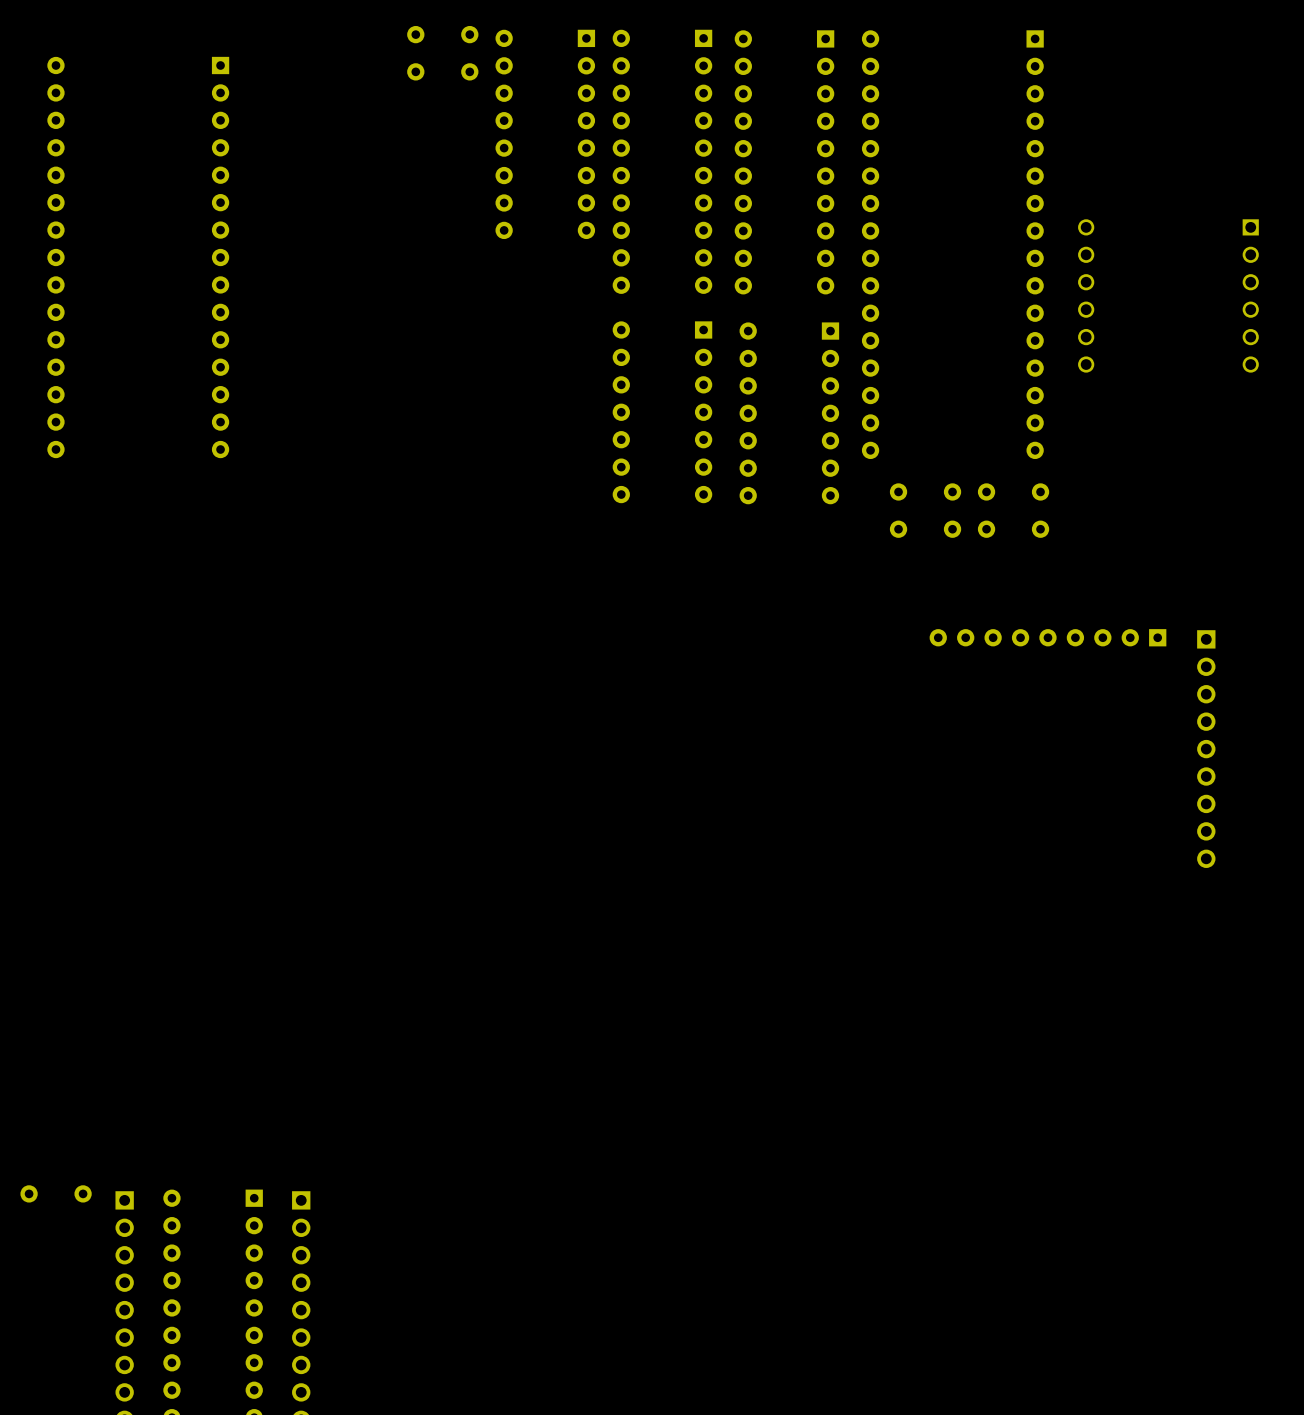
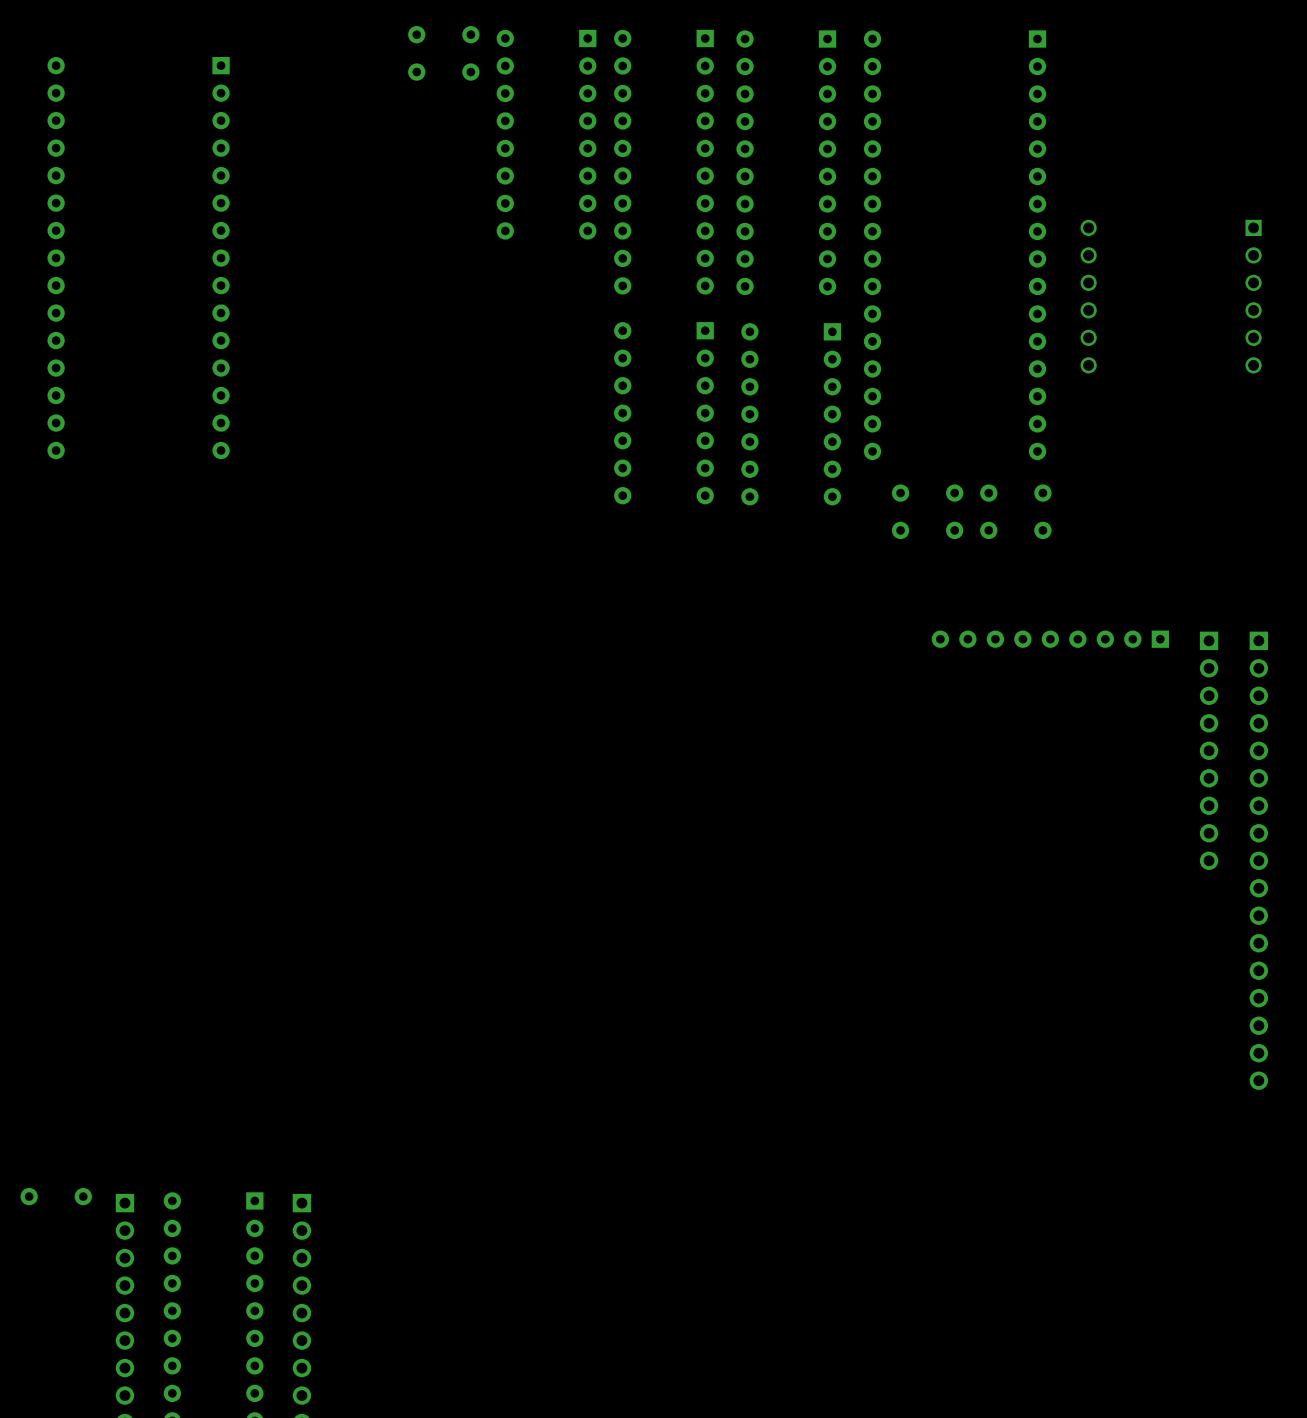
part: none -> (1258, 860)

